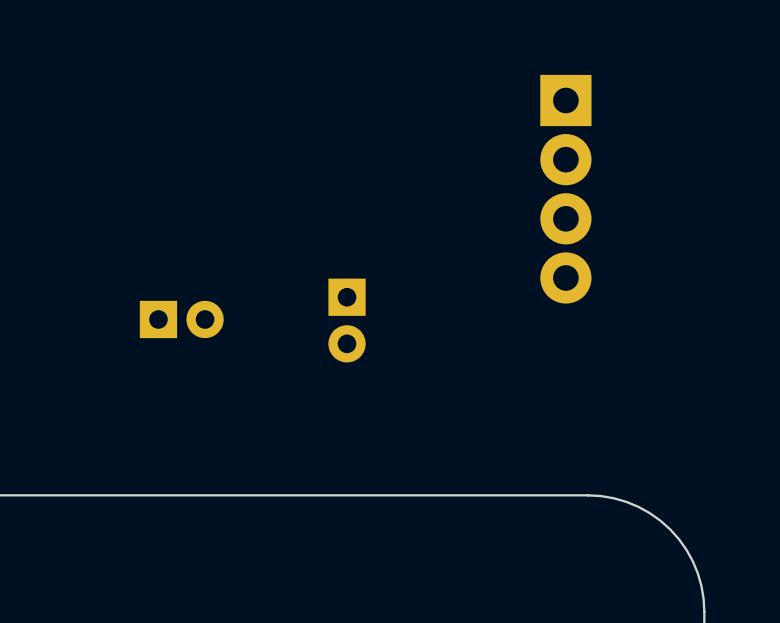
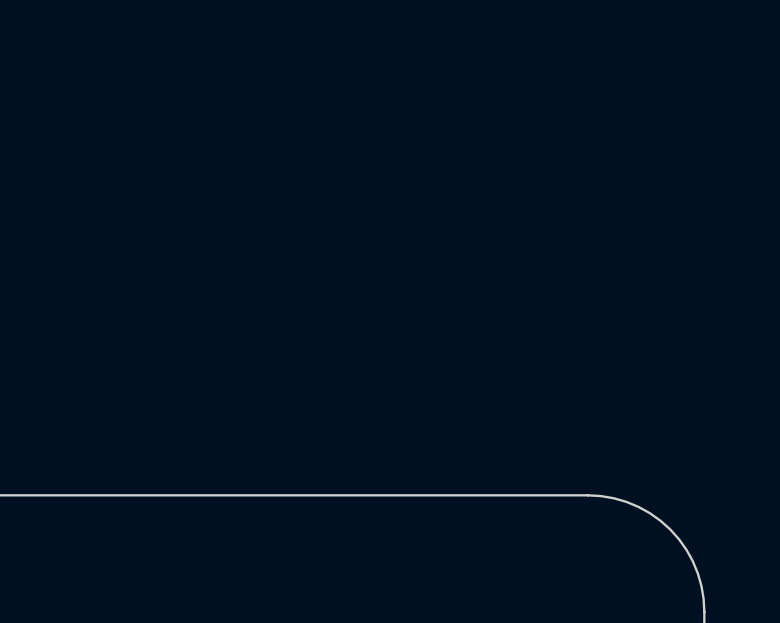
part: (565, 189) -> none
part: (181, 319) -> none
part: (347, 320) -> none

